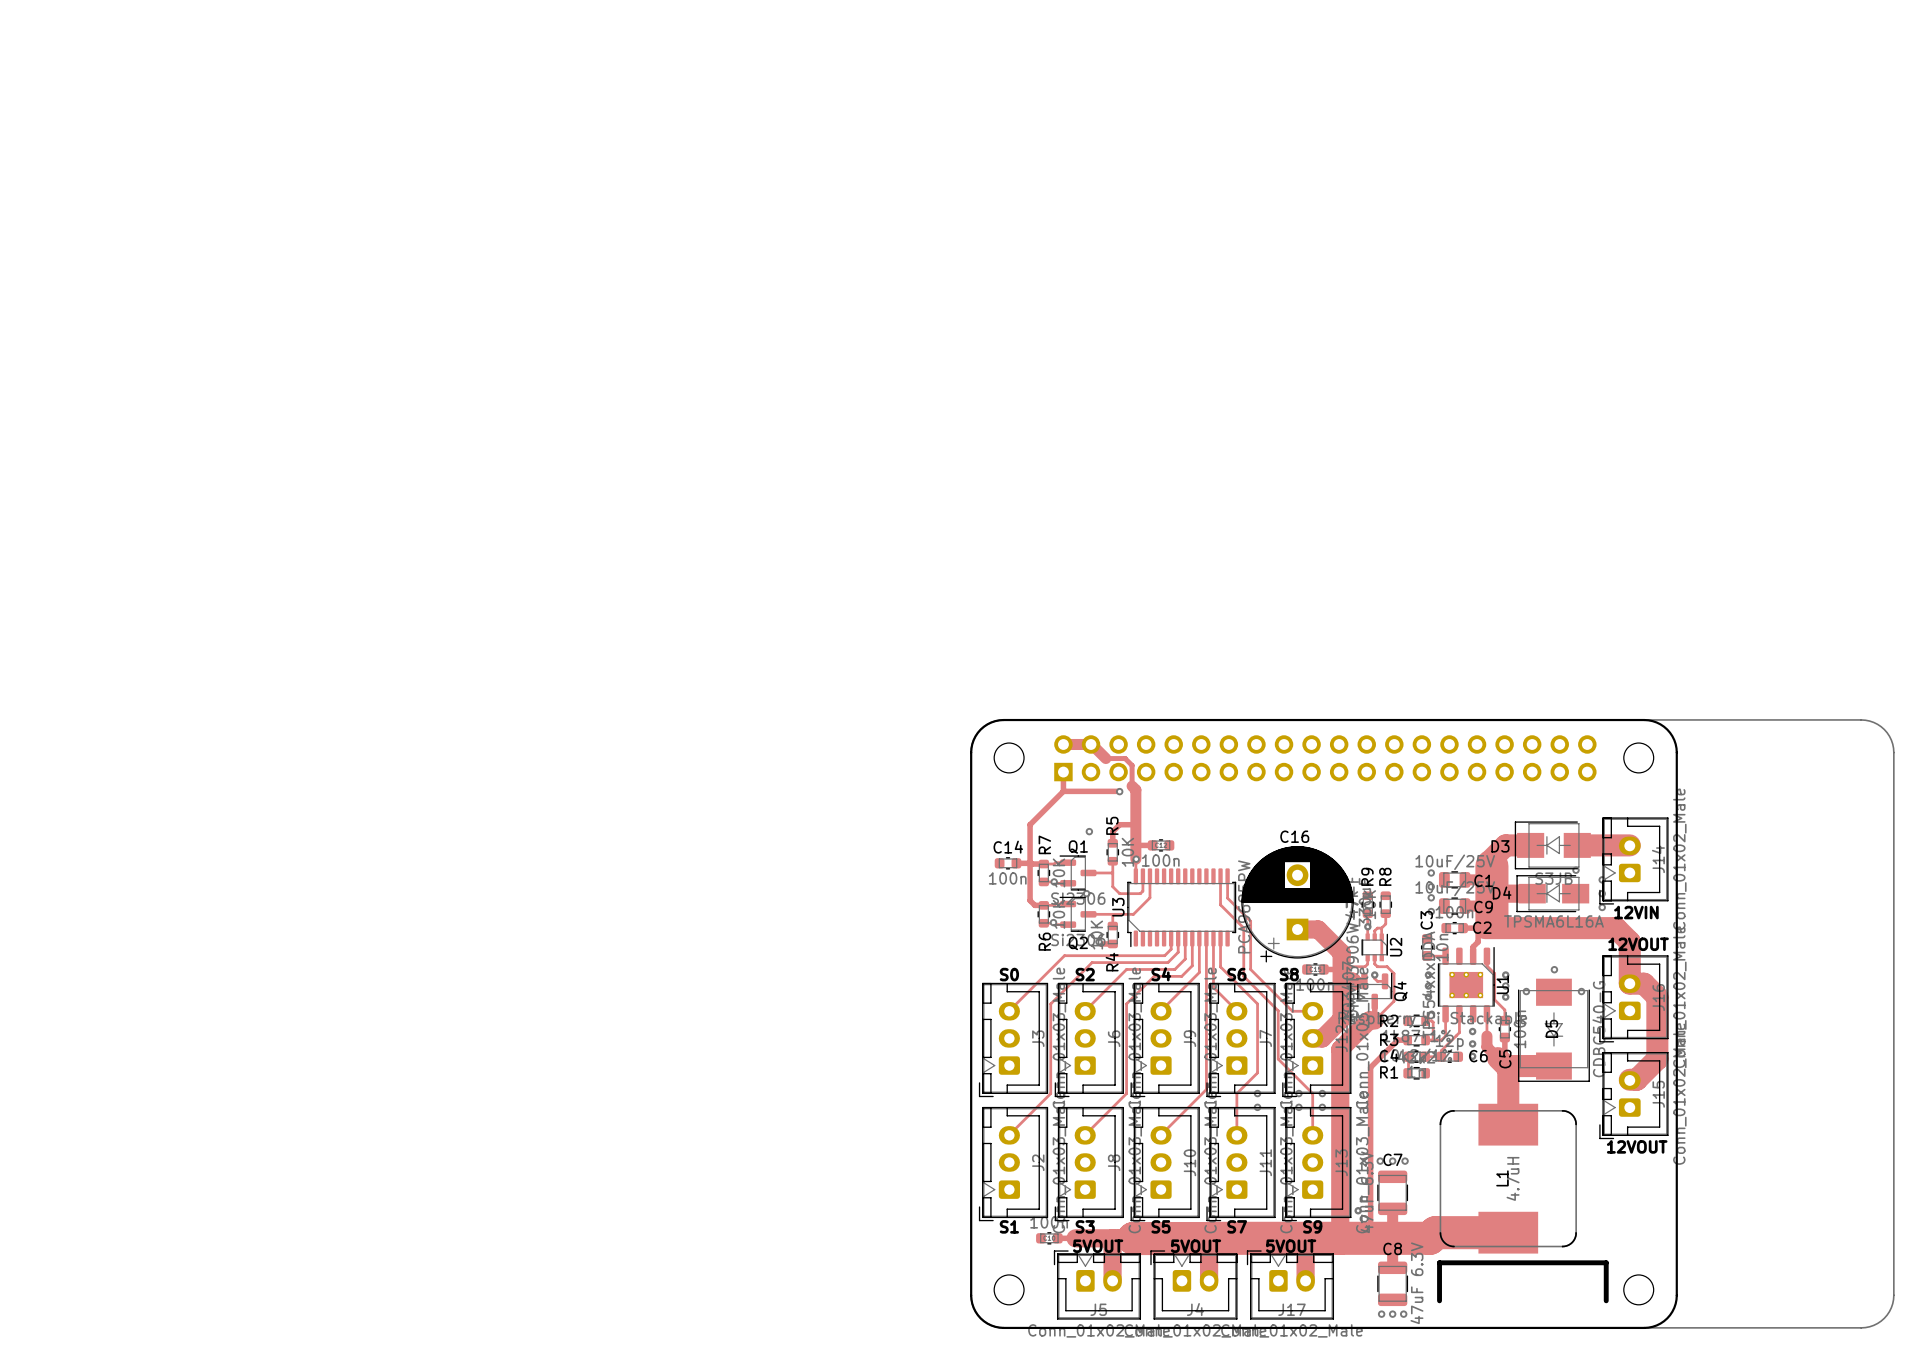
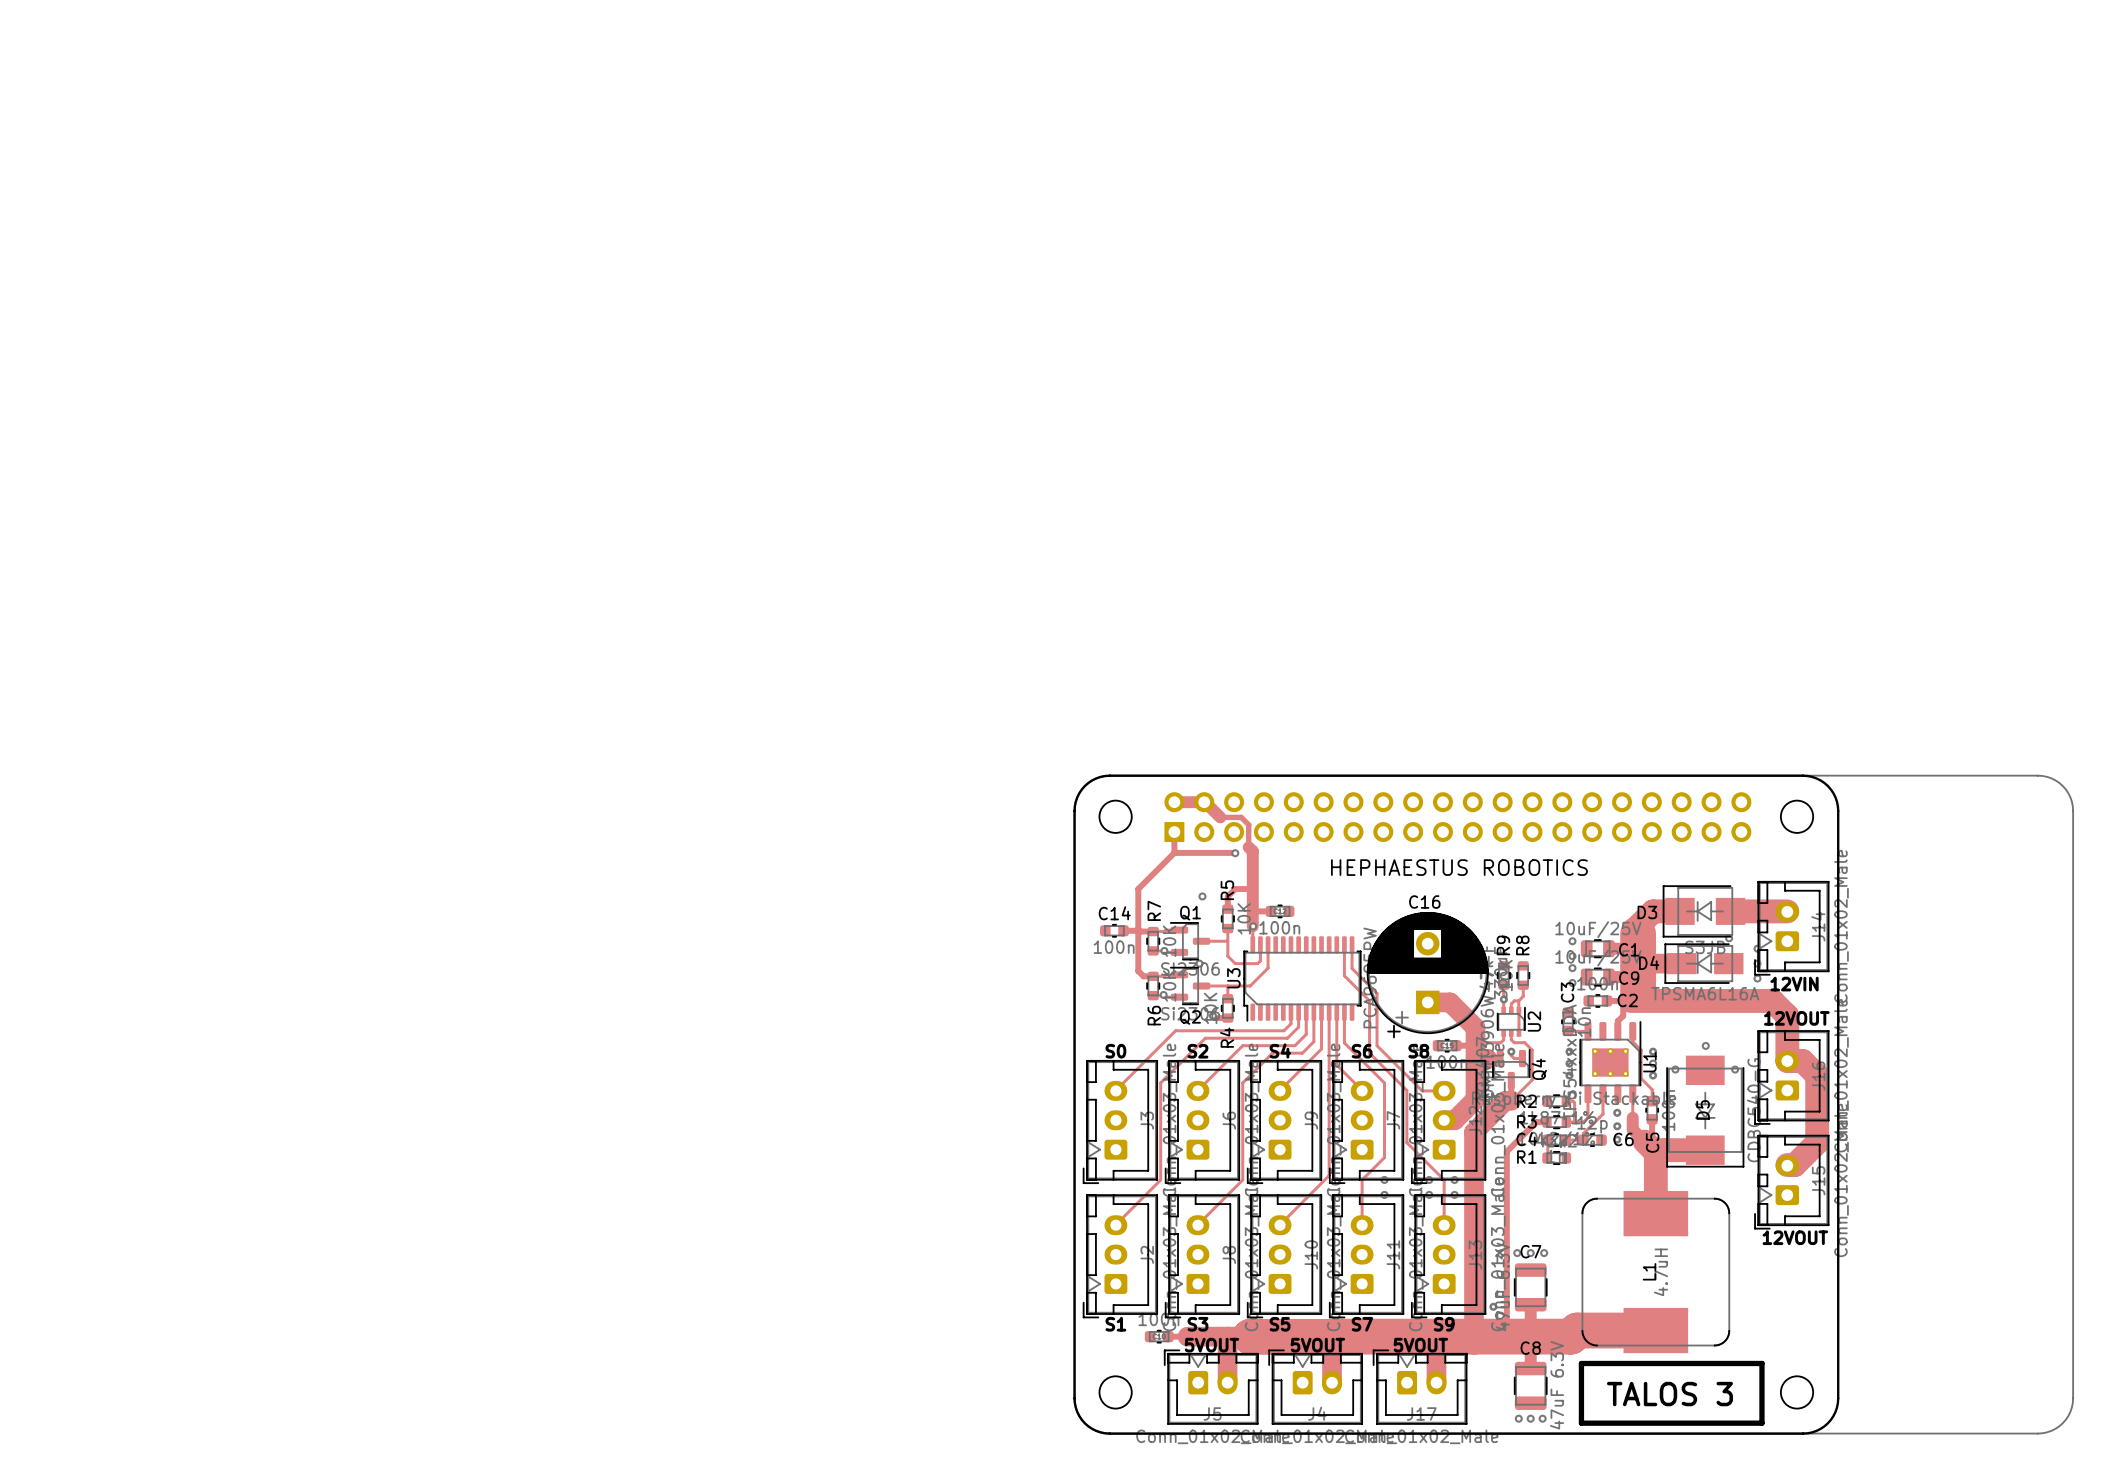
text: none -> HEPHAESTUS ROBOTICS (1459, 867)
line: (1439, 1263) (1606, 1262) (1606, 1300) -> (1581, 1363) (1761, 1363) (1761, 1423) (1581, 1423) (1579, 1399)
text: none -> TALOS 3 (1669, 1394)

